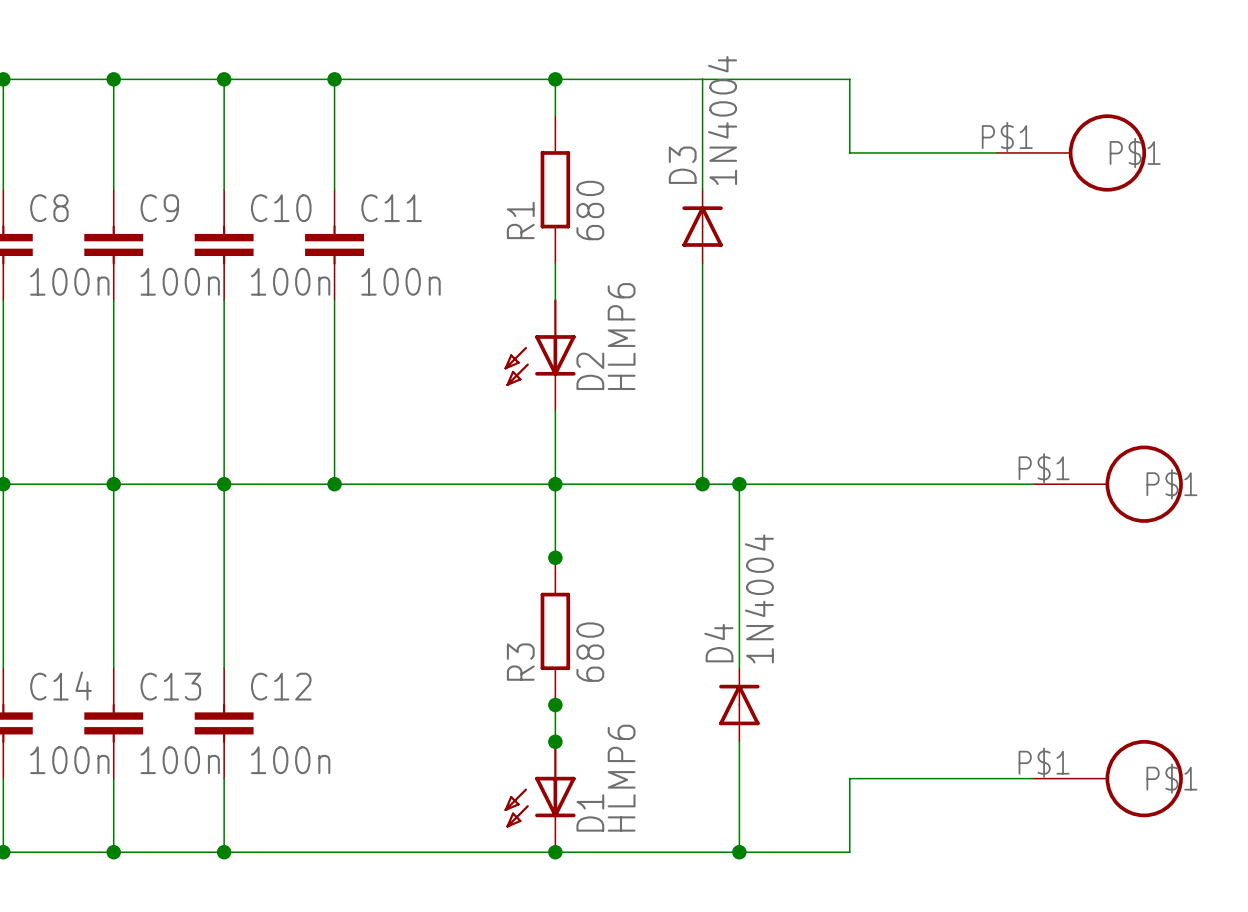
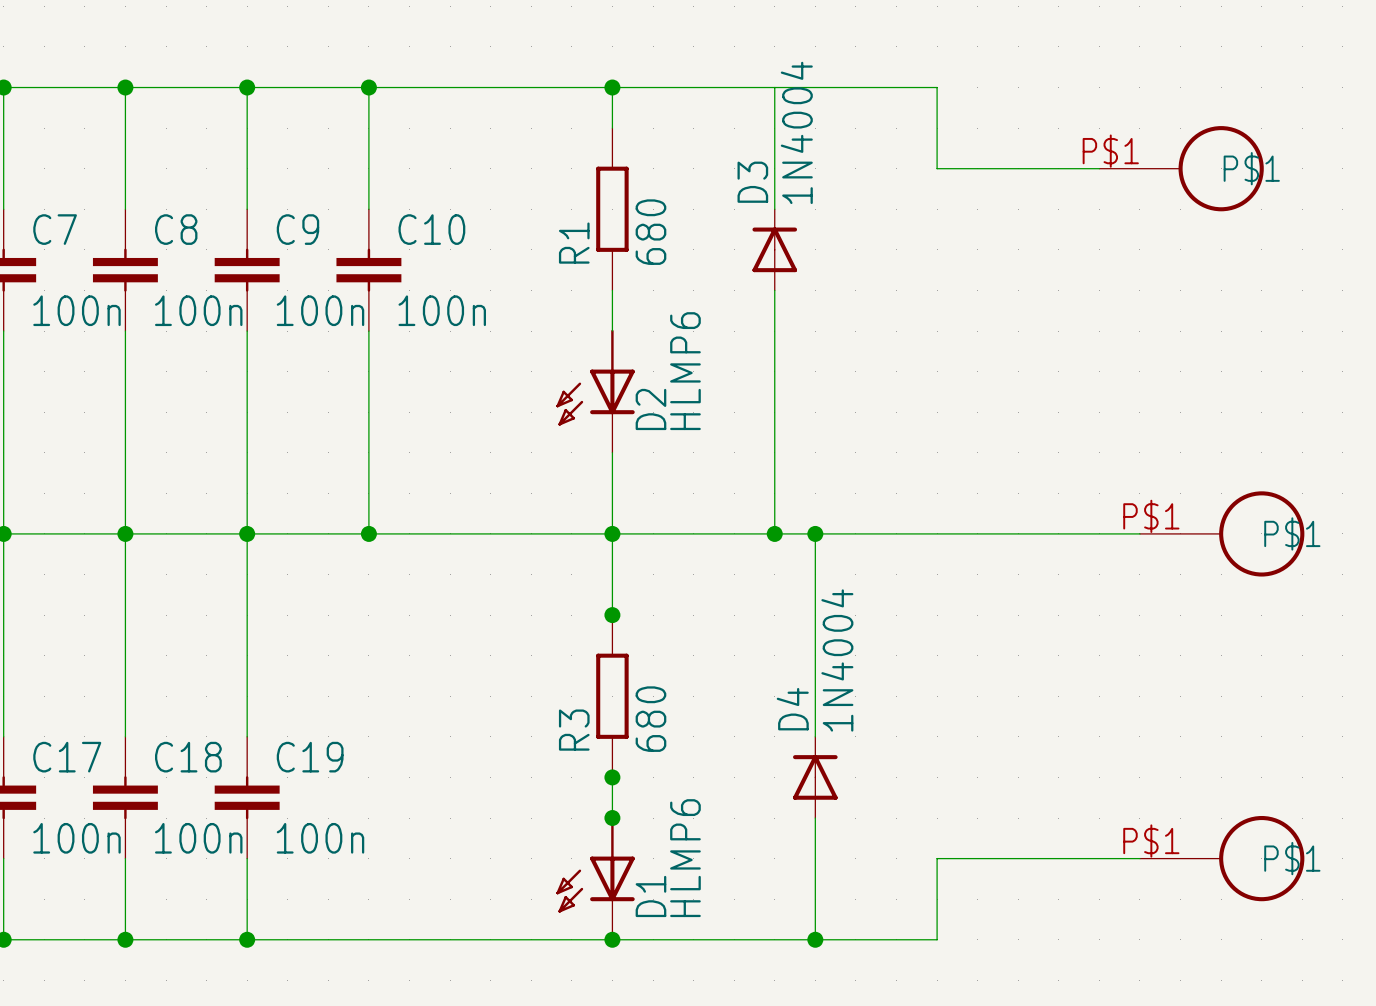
C8 name: C8 (49, 208) -> C7 (55, 229)
C9 name: C9 (159, 208) -> C8 (176, 229)
C10 name: C10 (281, 208) -> C9 (297, 229)
C11 name: C11 (391, 208) -> C10 (431, 229)
C14 name: C14 (60, 686) -> C17 (67, 757)
C13 name: C13 (170, 686) -> C18 (188, 757)
C12 name: C12 (281, 686) -> C19 (310, 757)

